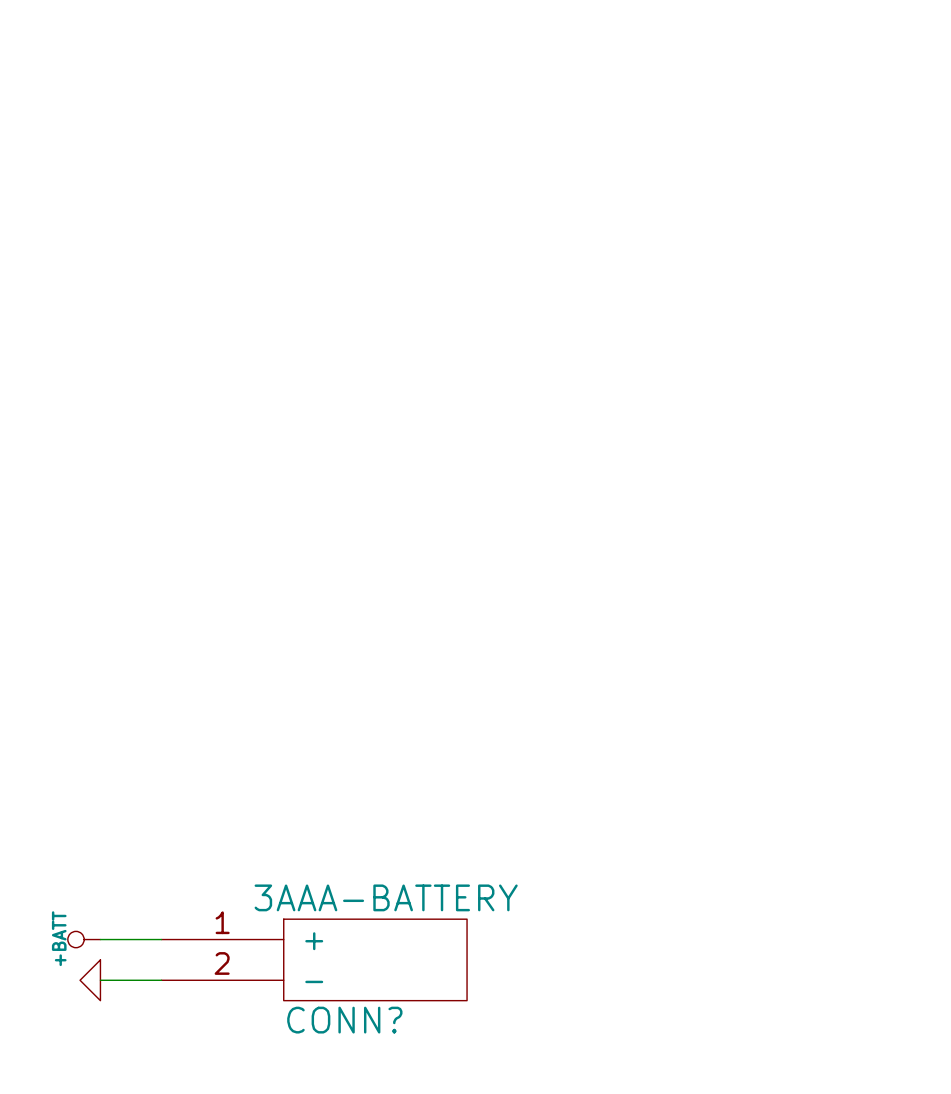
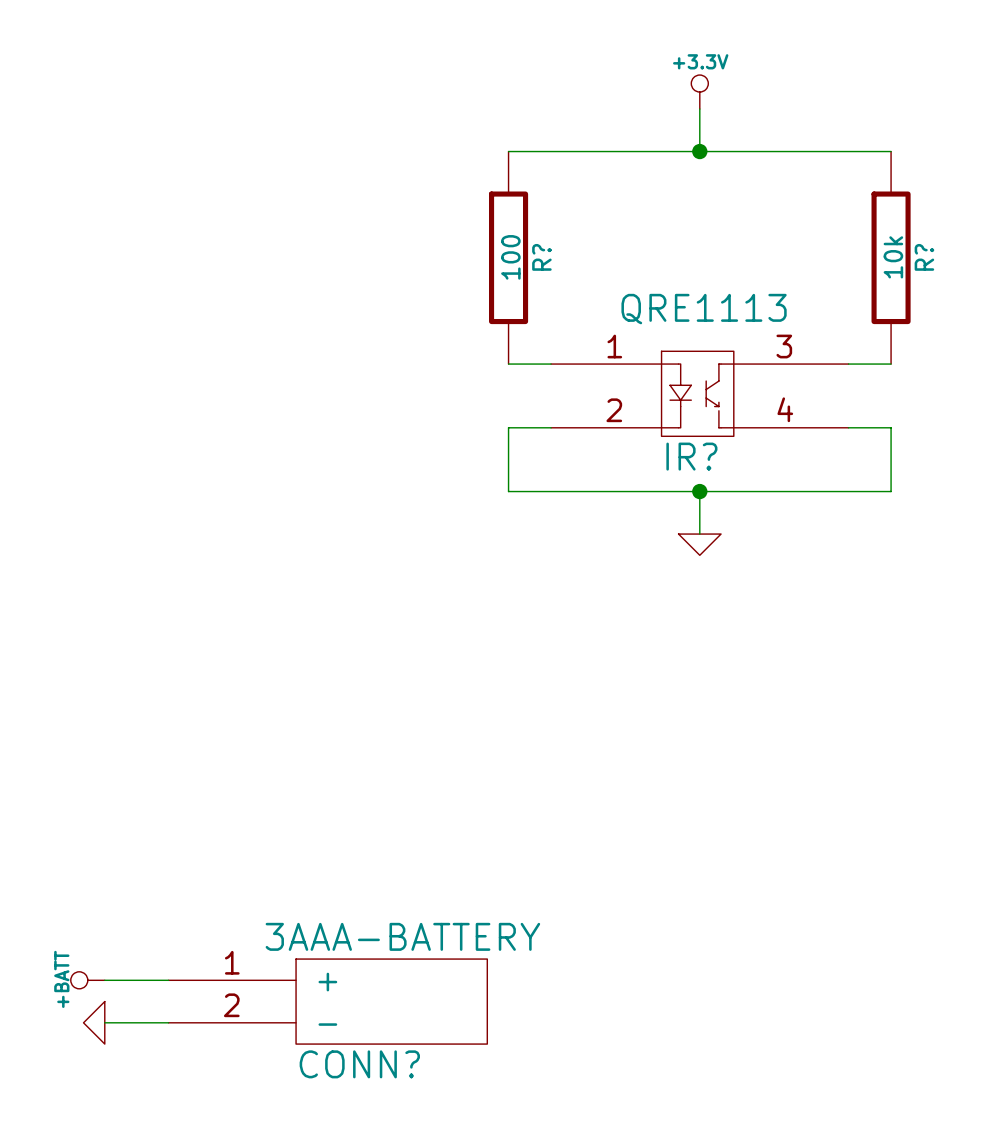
power symbol: none -> +3.3V (699, 92)
wire: none -> (699, 109) (699, 151)
wire: none -> (508, 151) (891, 151)
junction: none -> (699, 151)
R?: none -> 100 (508, 257)
R?: none -> 10k (891, 257)
wire: none -> (508, 364) (551, 364)
wire: none -> (848, 364) (891, 364)
IR?: none -> QRE1113 (699, 393)
wire: none -> (551, 427) (508, 427) (508, 491) (891, 491) (891, 427) (848, 427)
wire: none -> (699, 491) (699, 534)
junction: none -> (699, 491)
power symbol: none -> (699, 544)

